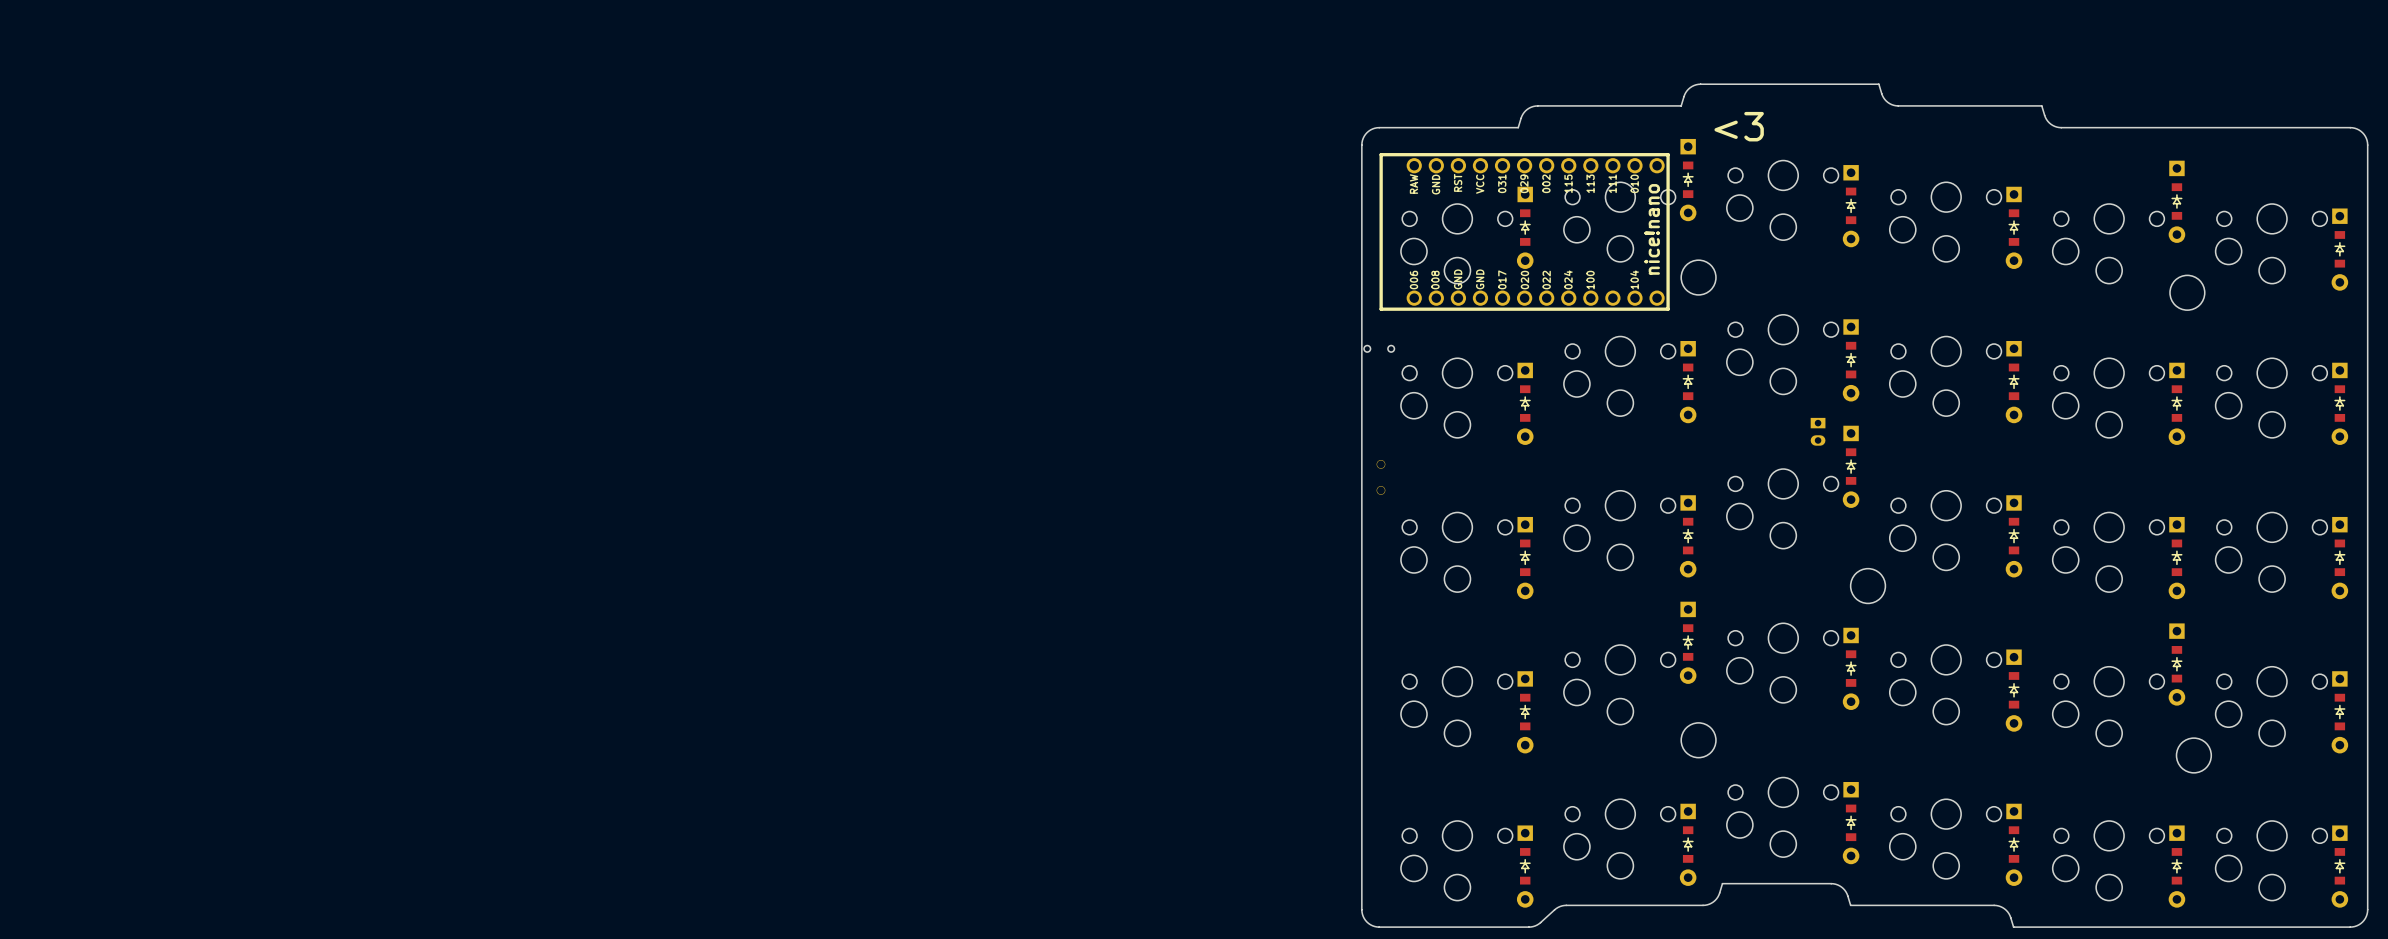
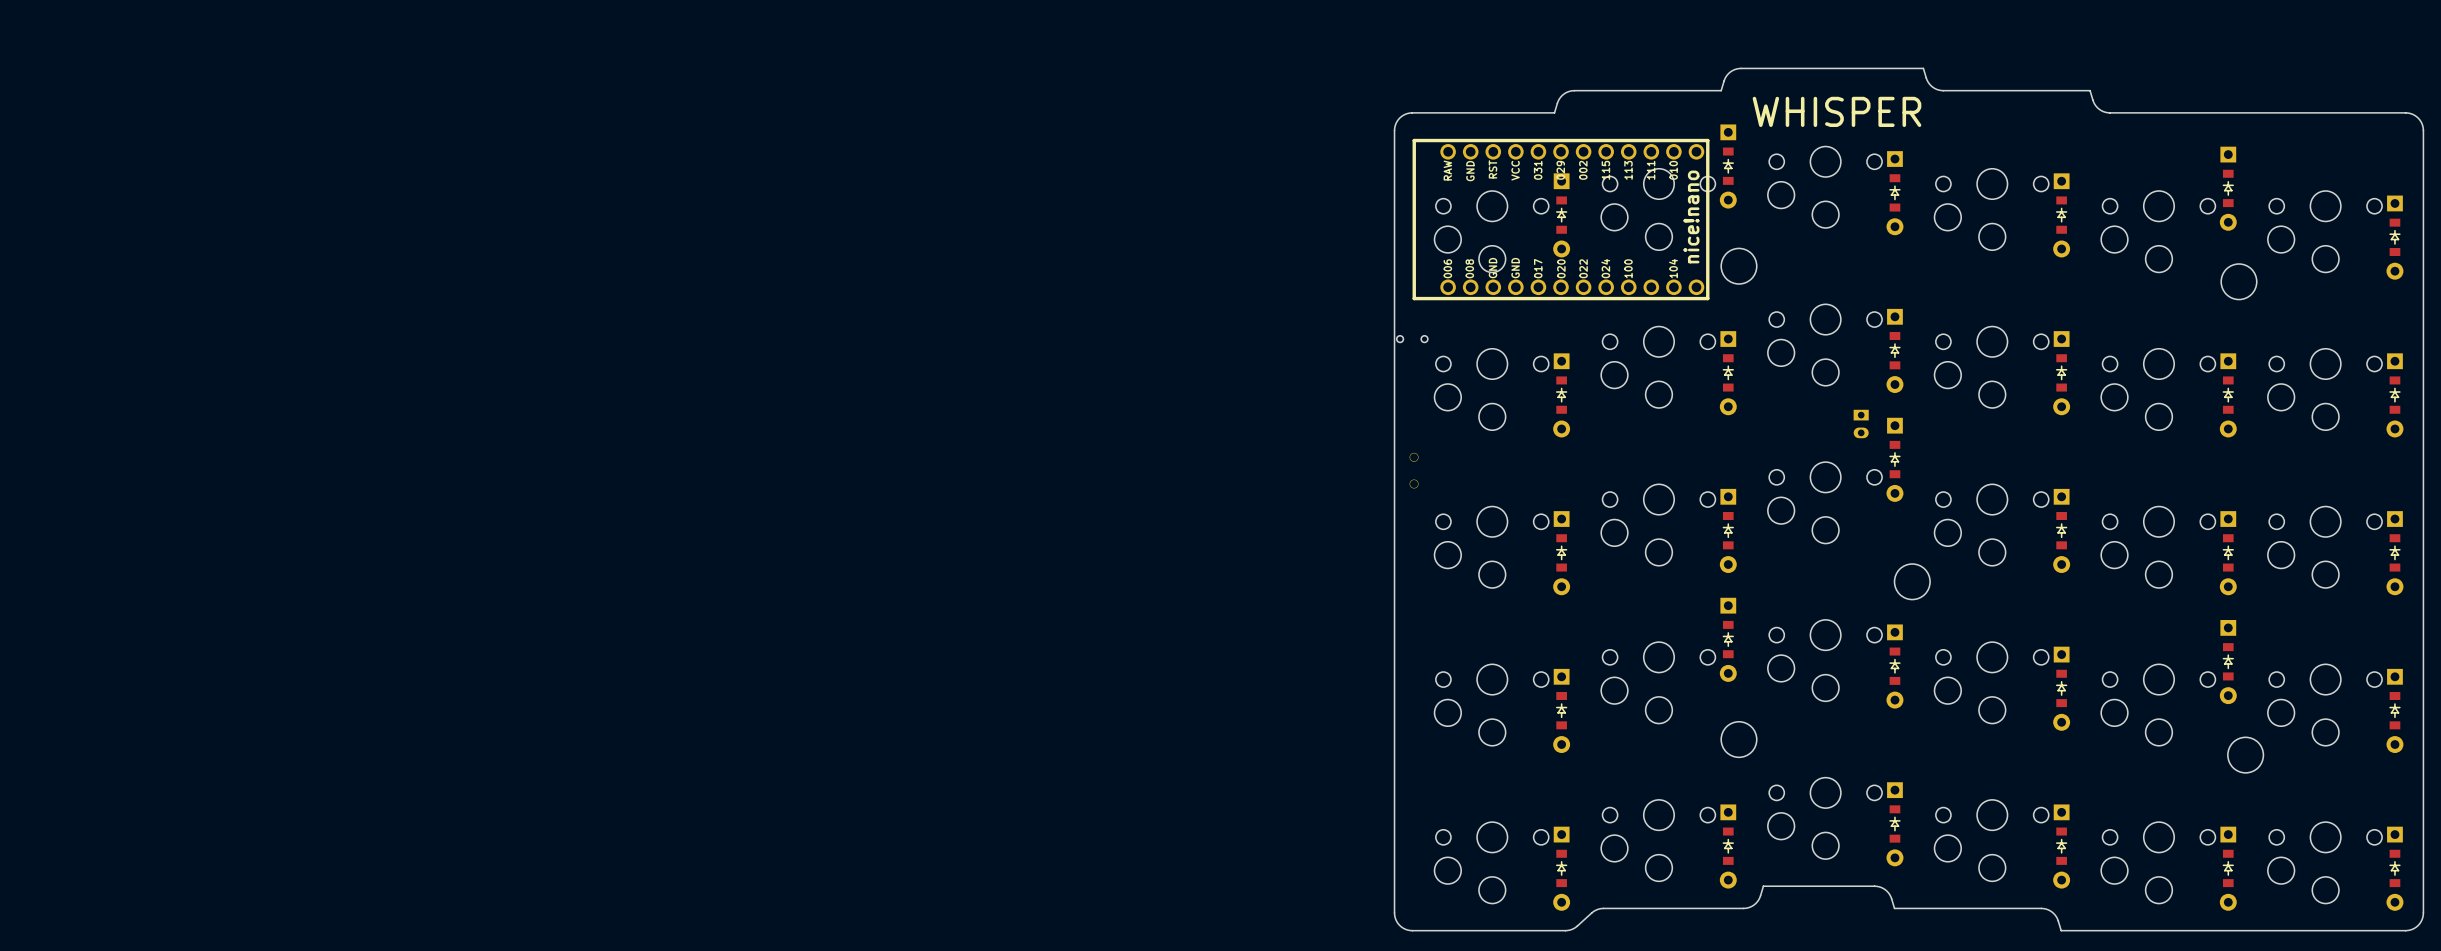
text: <3 (1739, 126) -> WHISPER (1836, 111)

